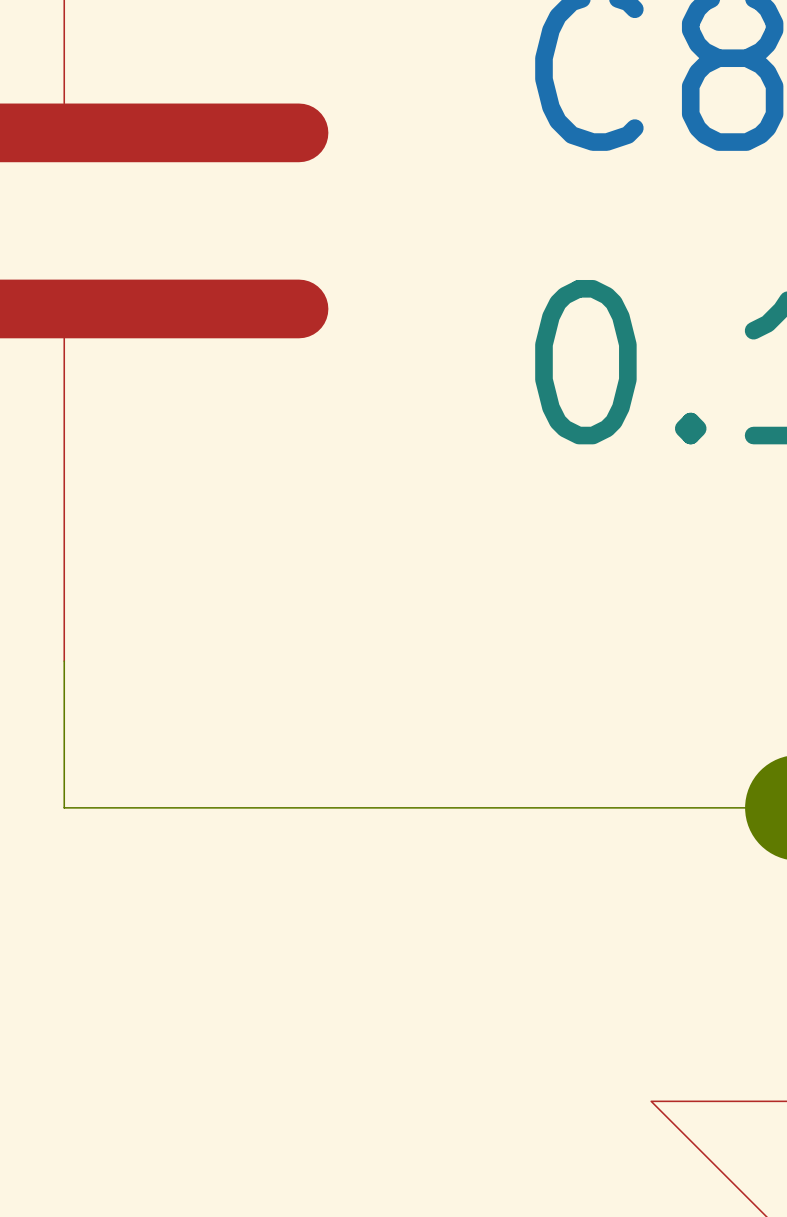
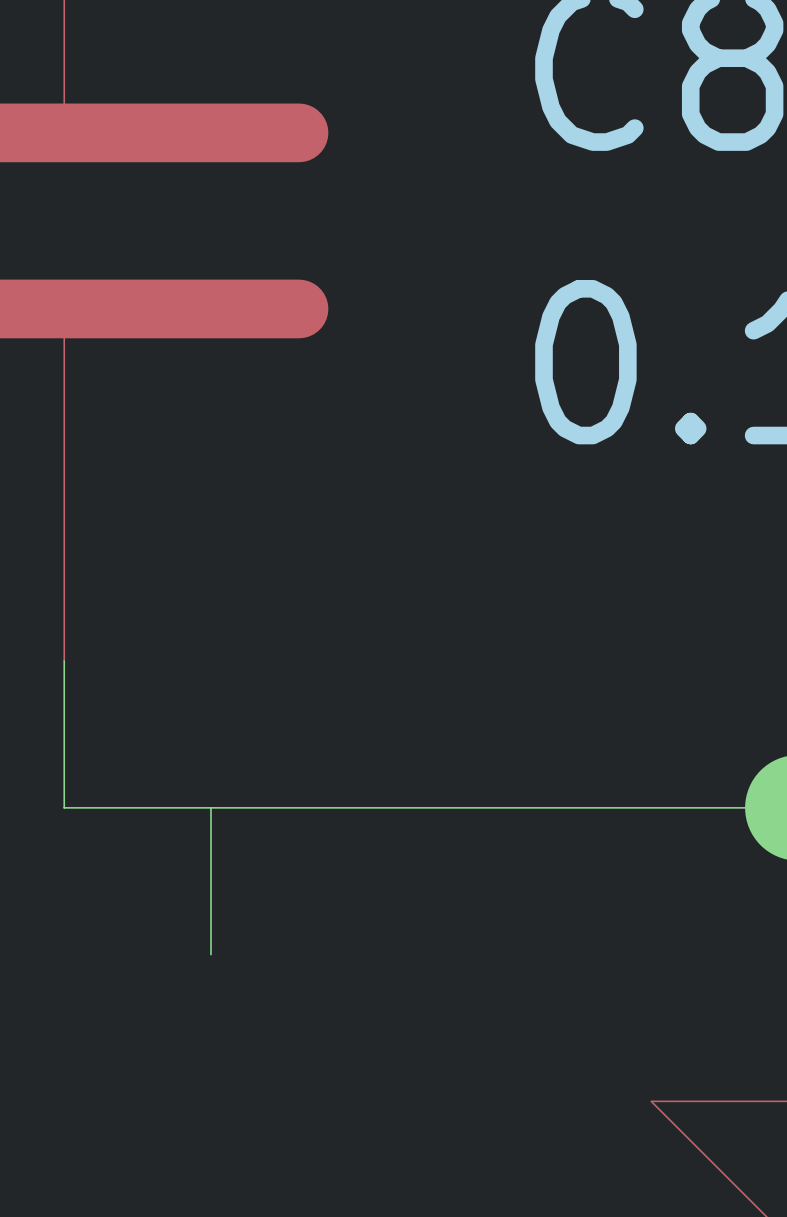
wire: none -> (210, 807) (210, 954)

